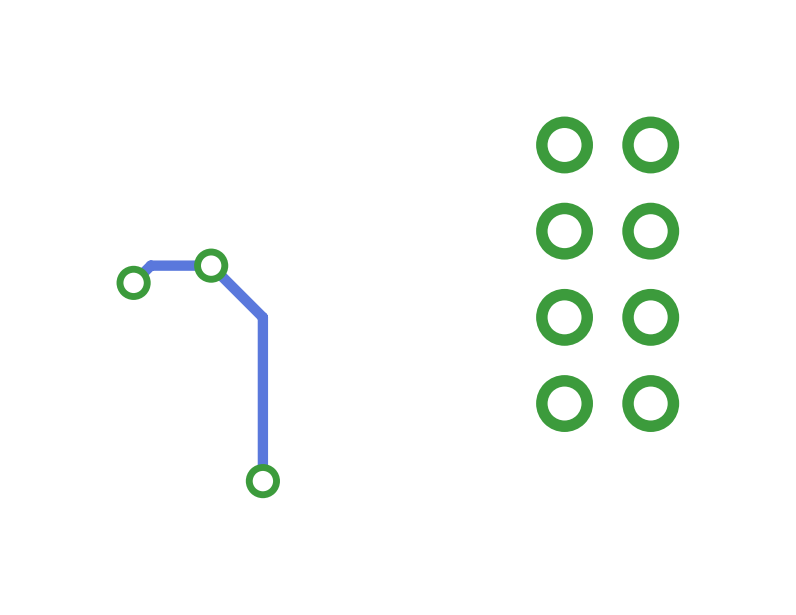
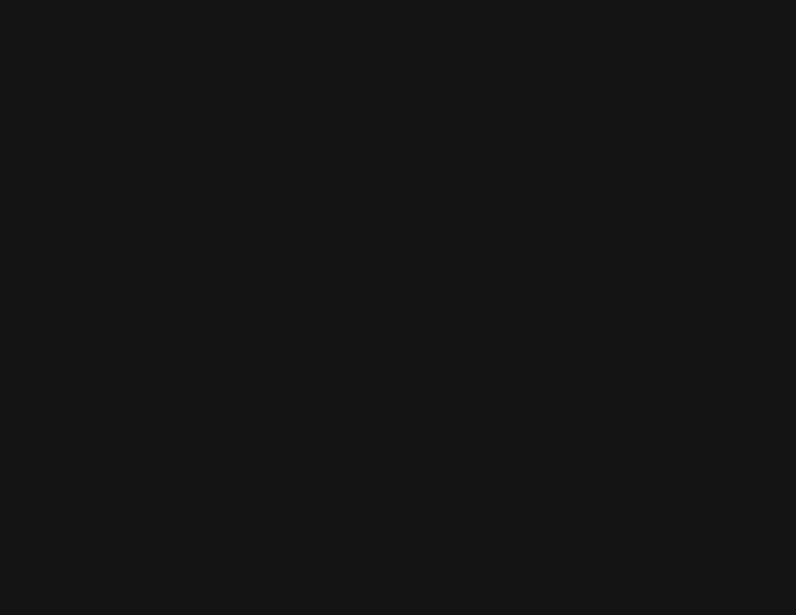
via: (211, 265) -> none
part: (564, 274) -> none
part: (650, 274) -> none
track: (133, 282) (150, 265) (211, 265) (262, 317) (262, 481) -> none
via: (133, 282) -> none
via: (262, 481) -> none

